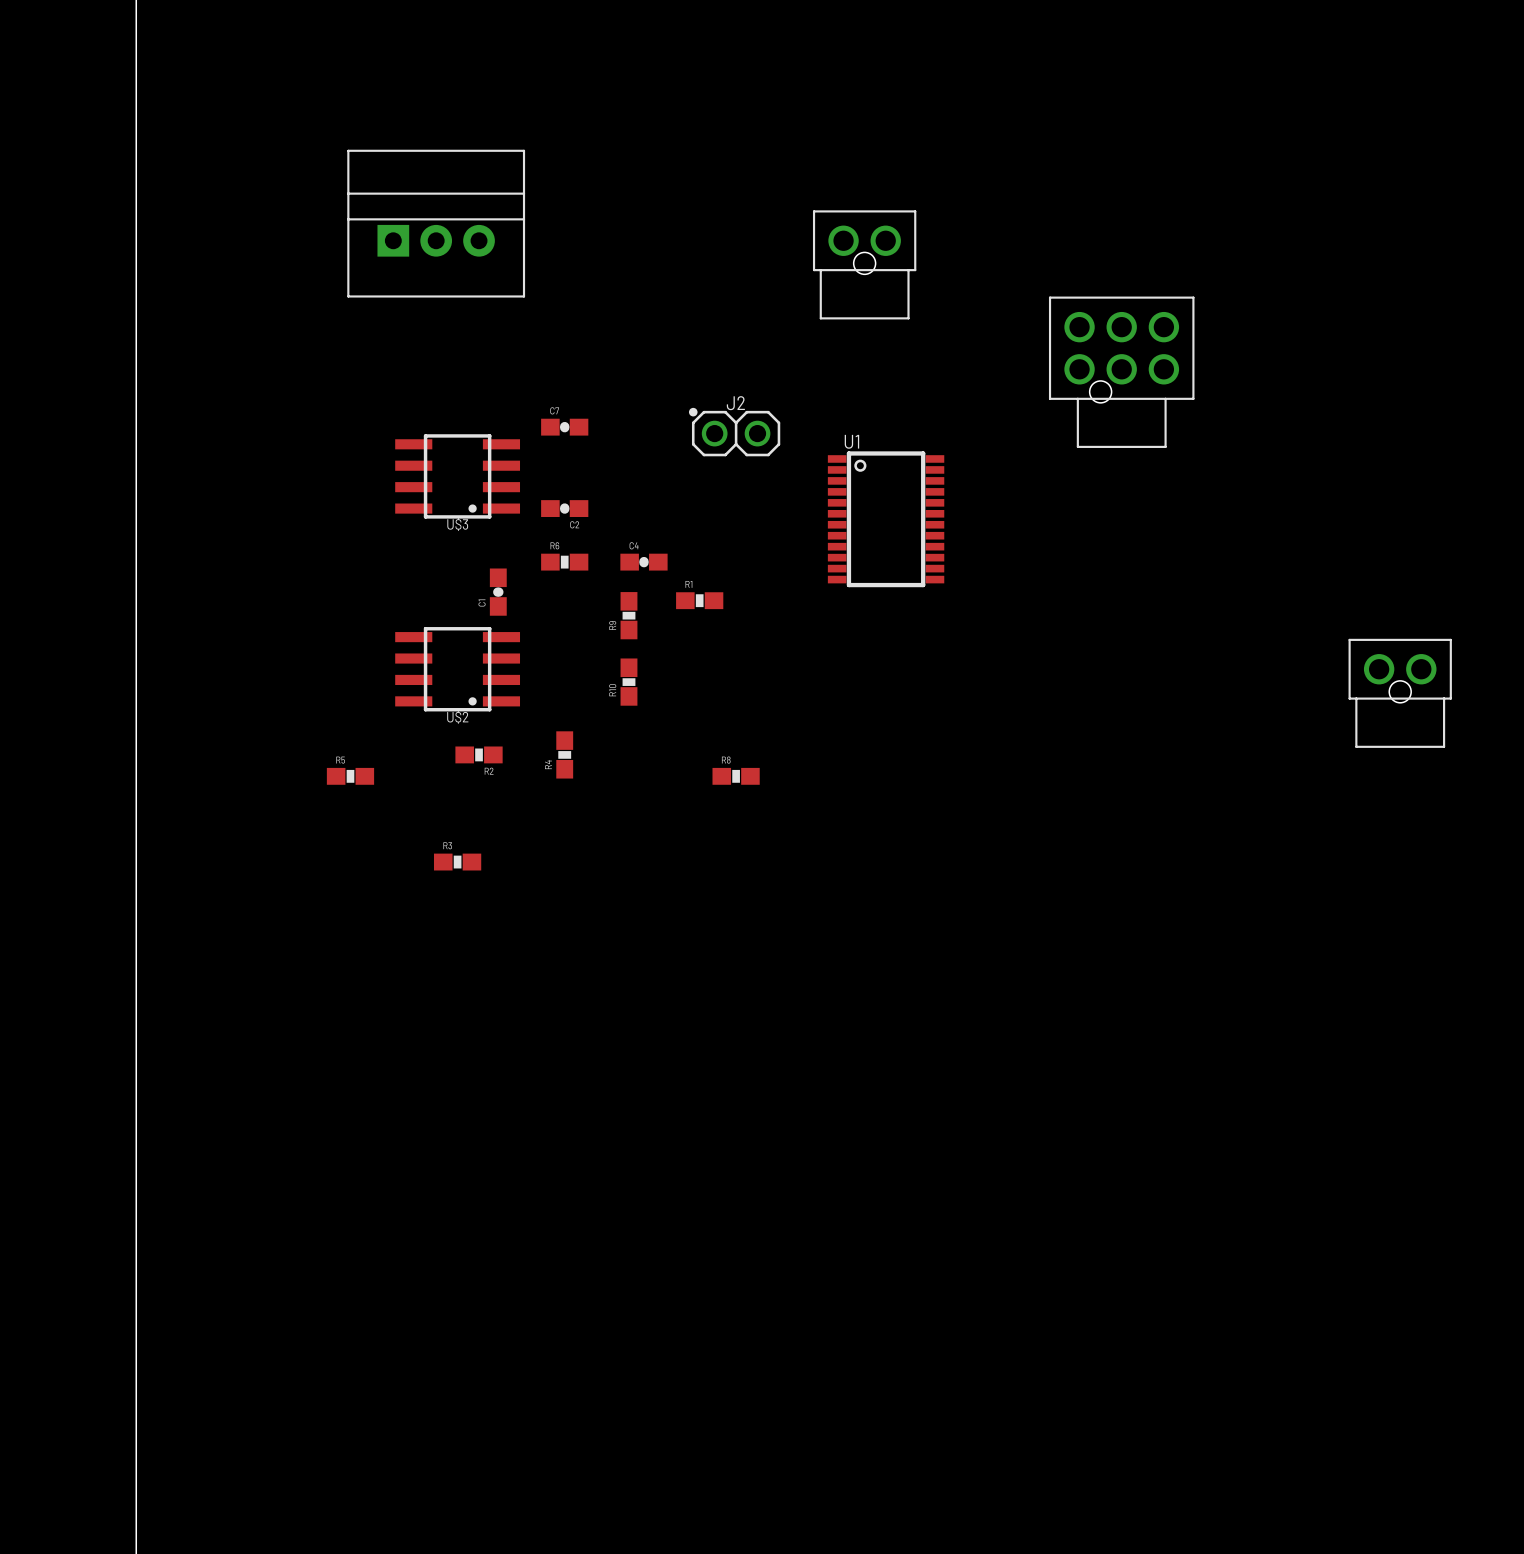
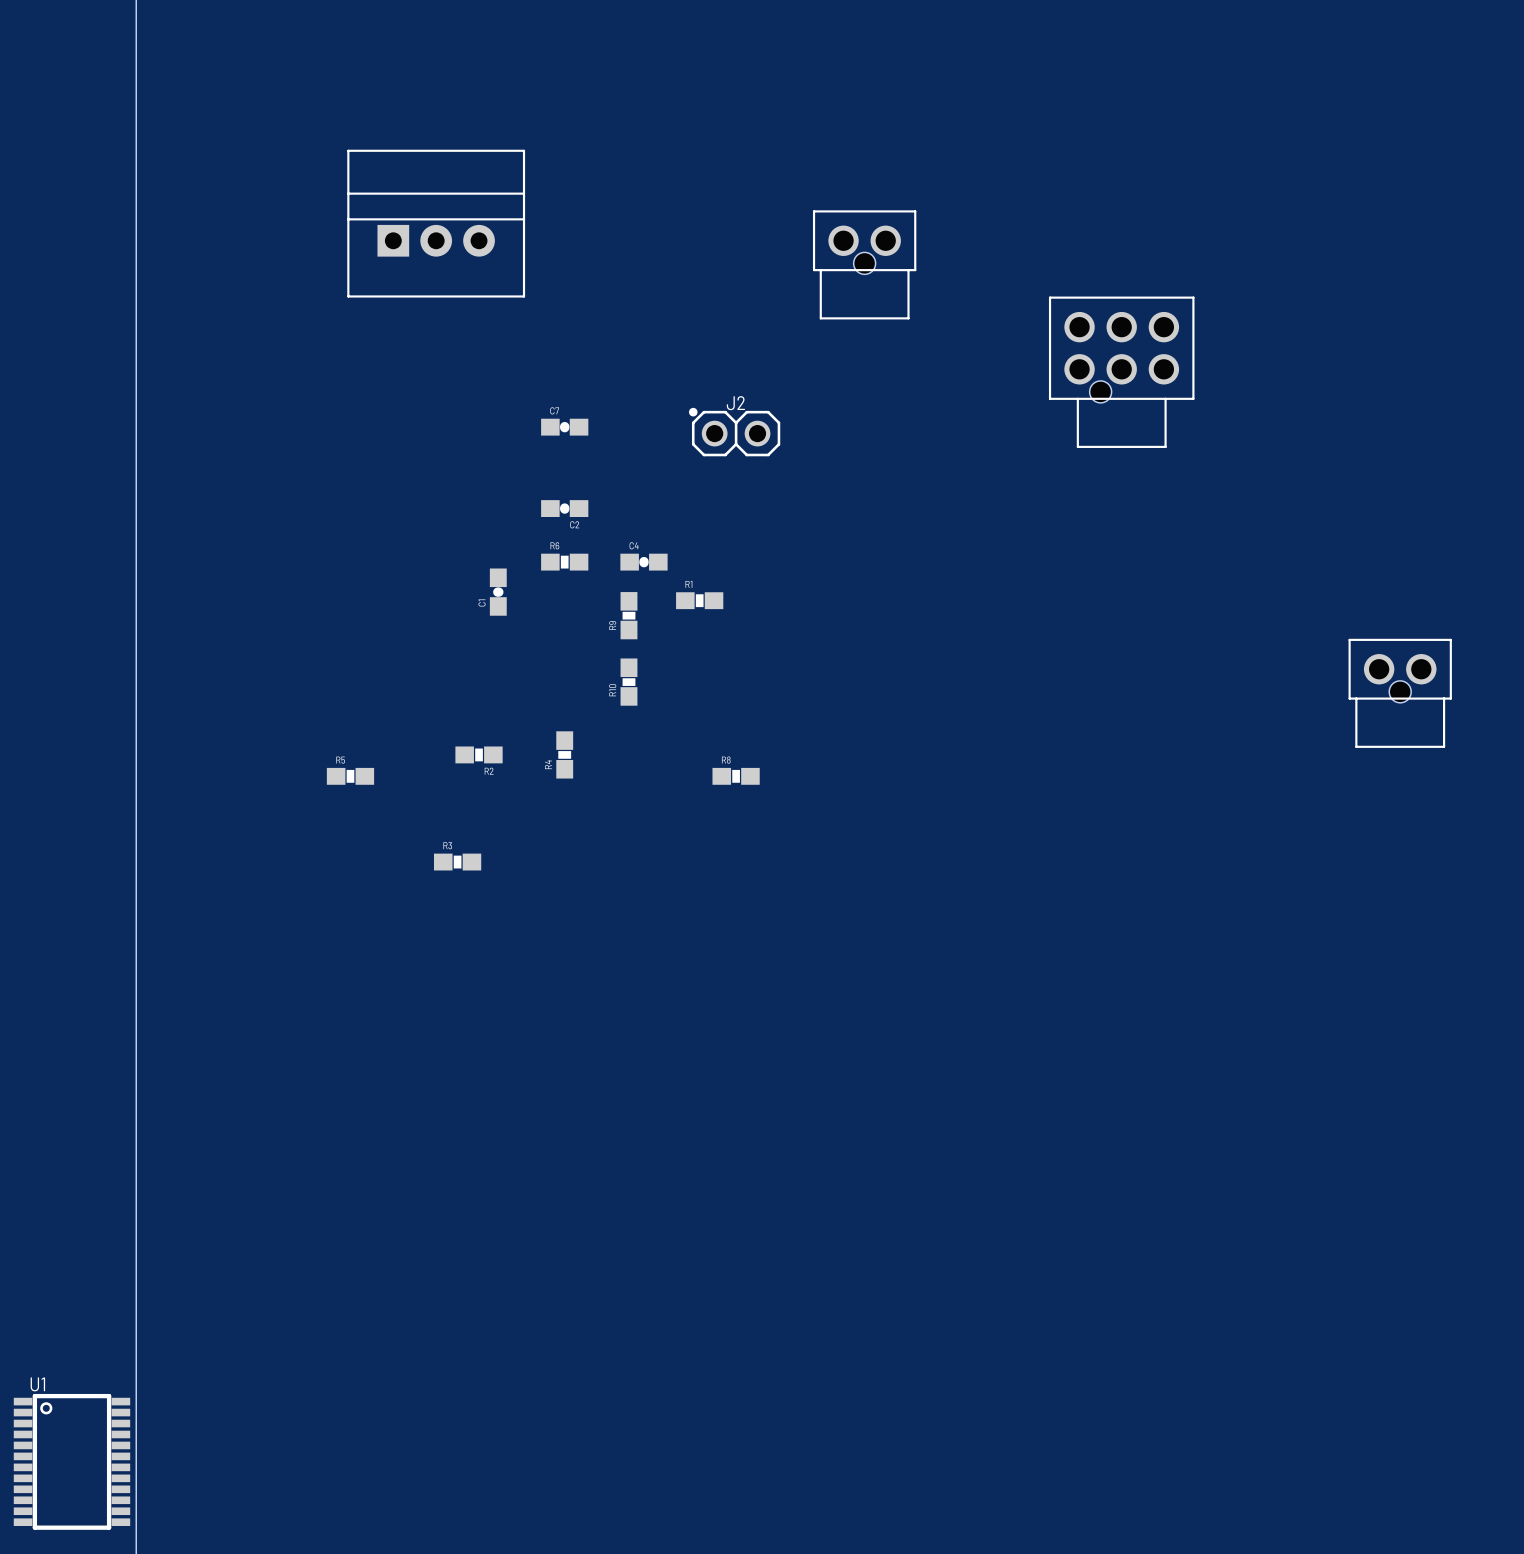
U$3: (457, 476) -> none
U1 position: (886, 519) -> (71, 1461)
U$2: (457, 669) -> none

